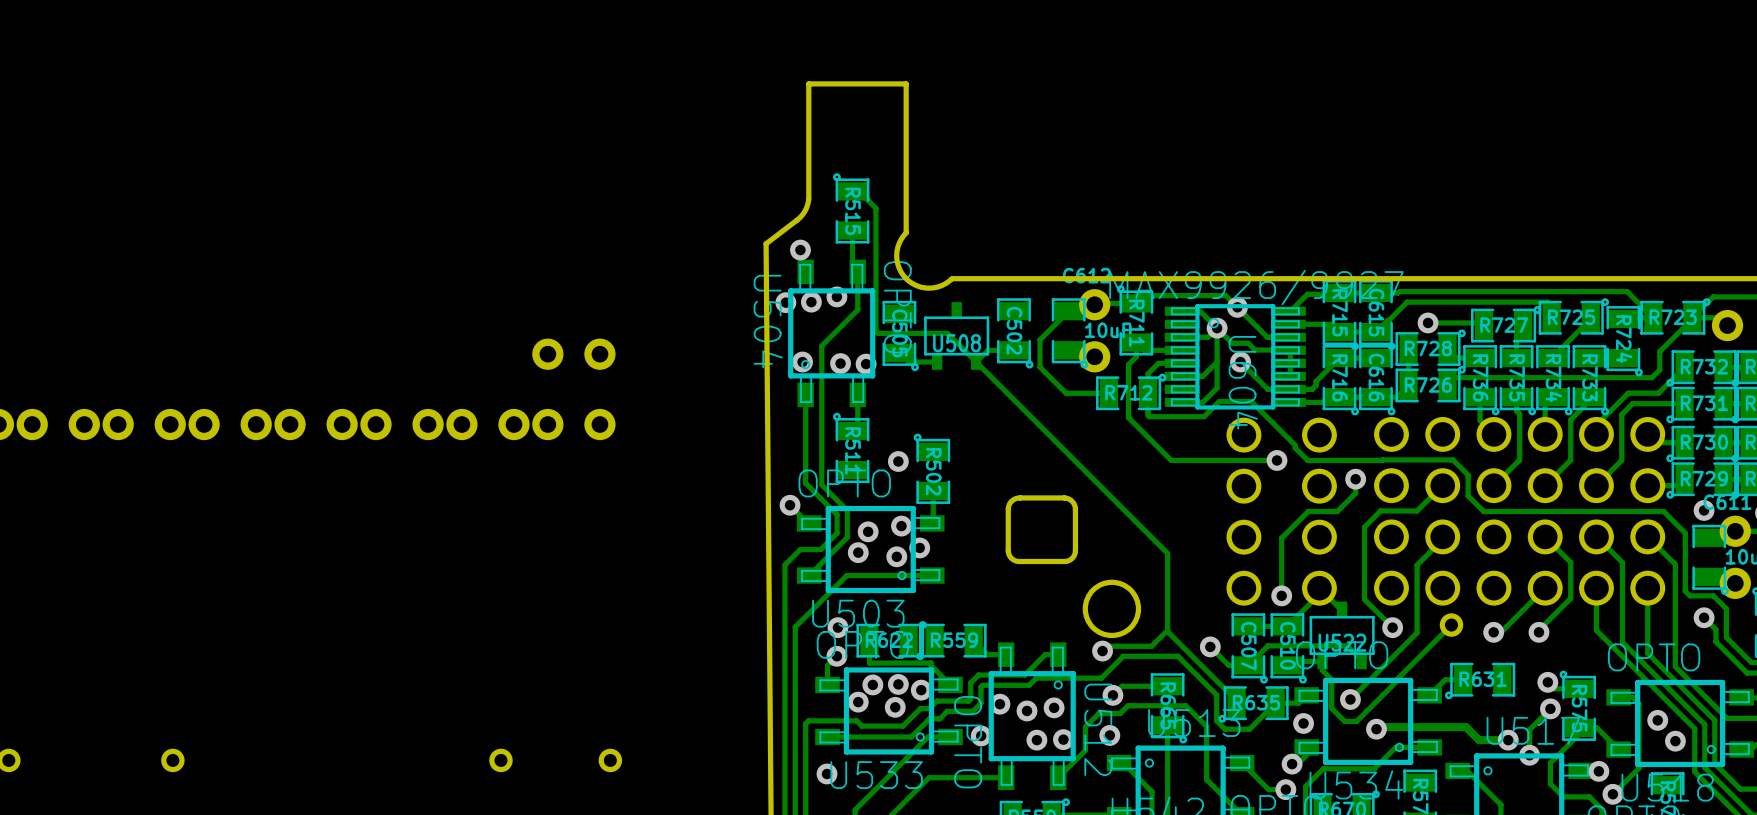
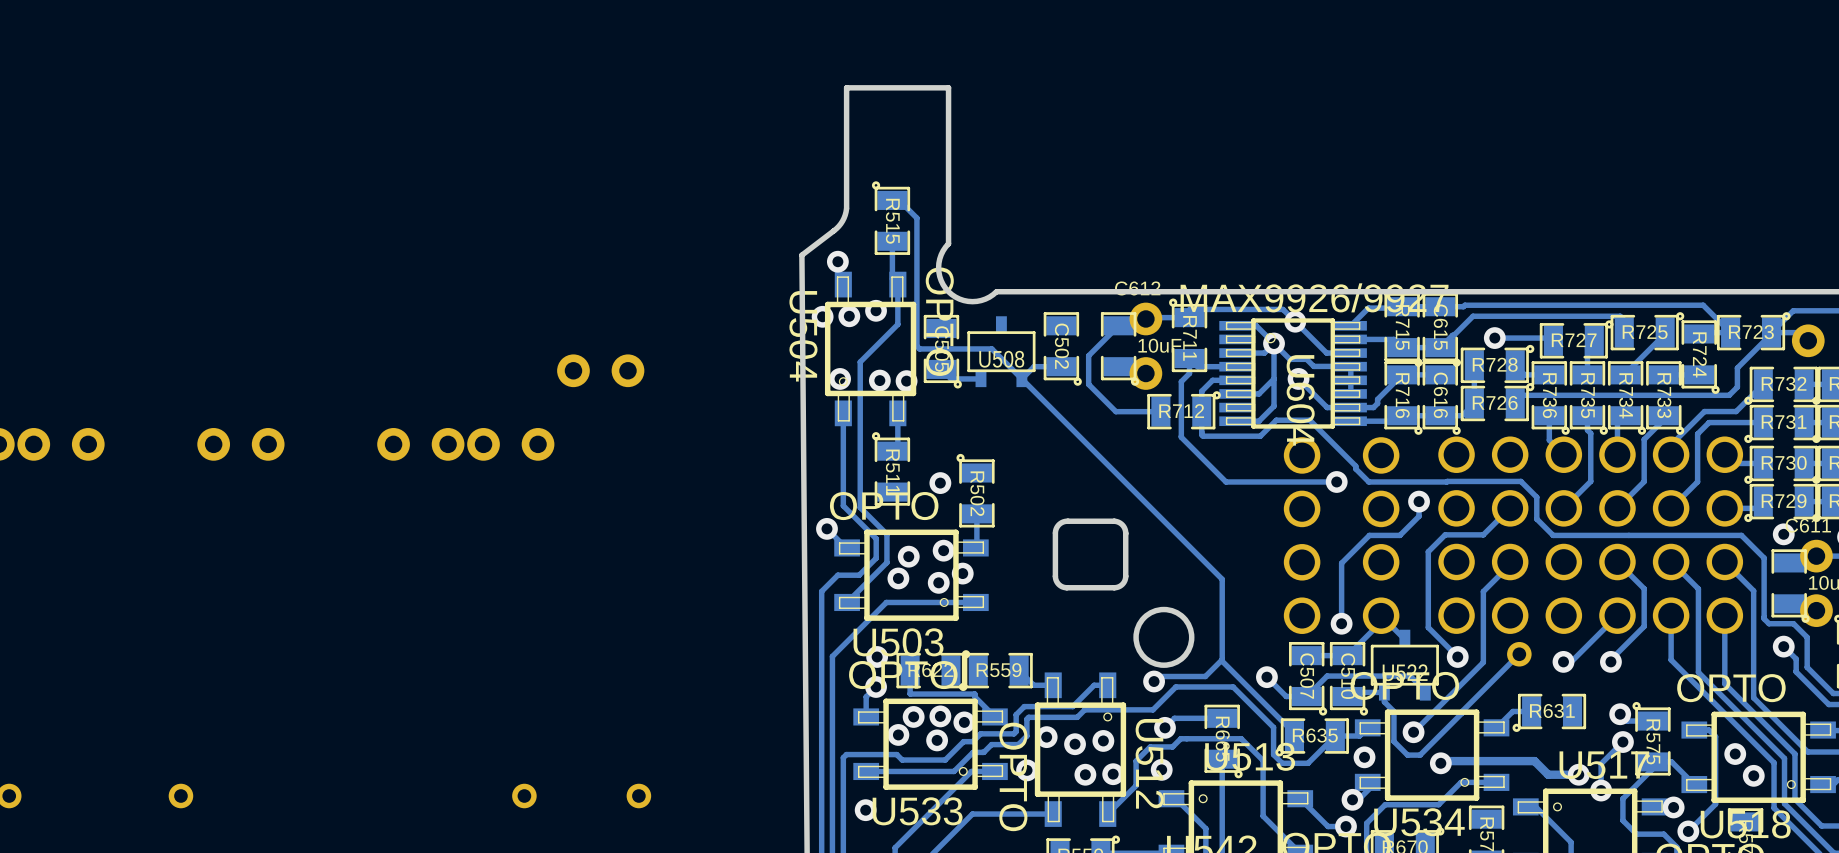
part: (144, 424) -> none
part: (316, 424) -> none
part: (573, 424) -> none

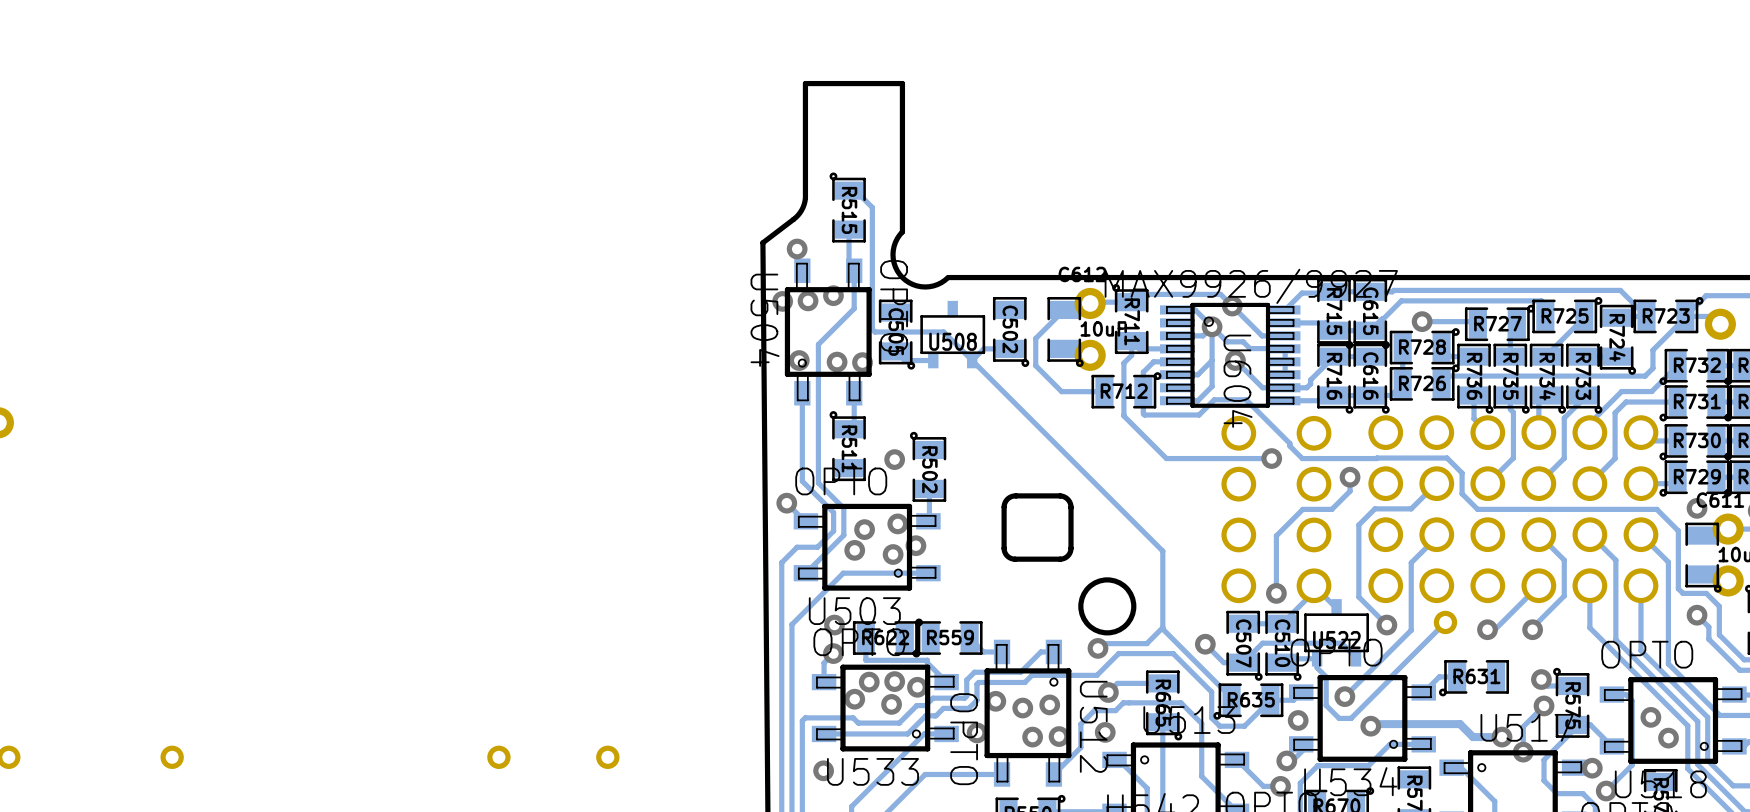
part: (600, 370) -> none
part: (61, 444) -> none
part: (240, 444) -> none
part: (420, 444) -> none
part: (510, 444) -> none

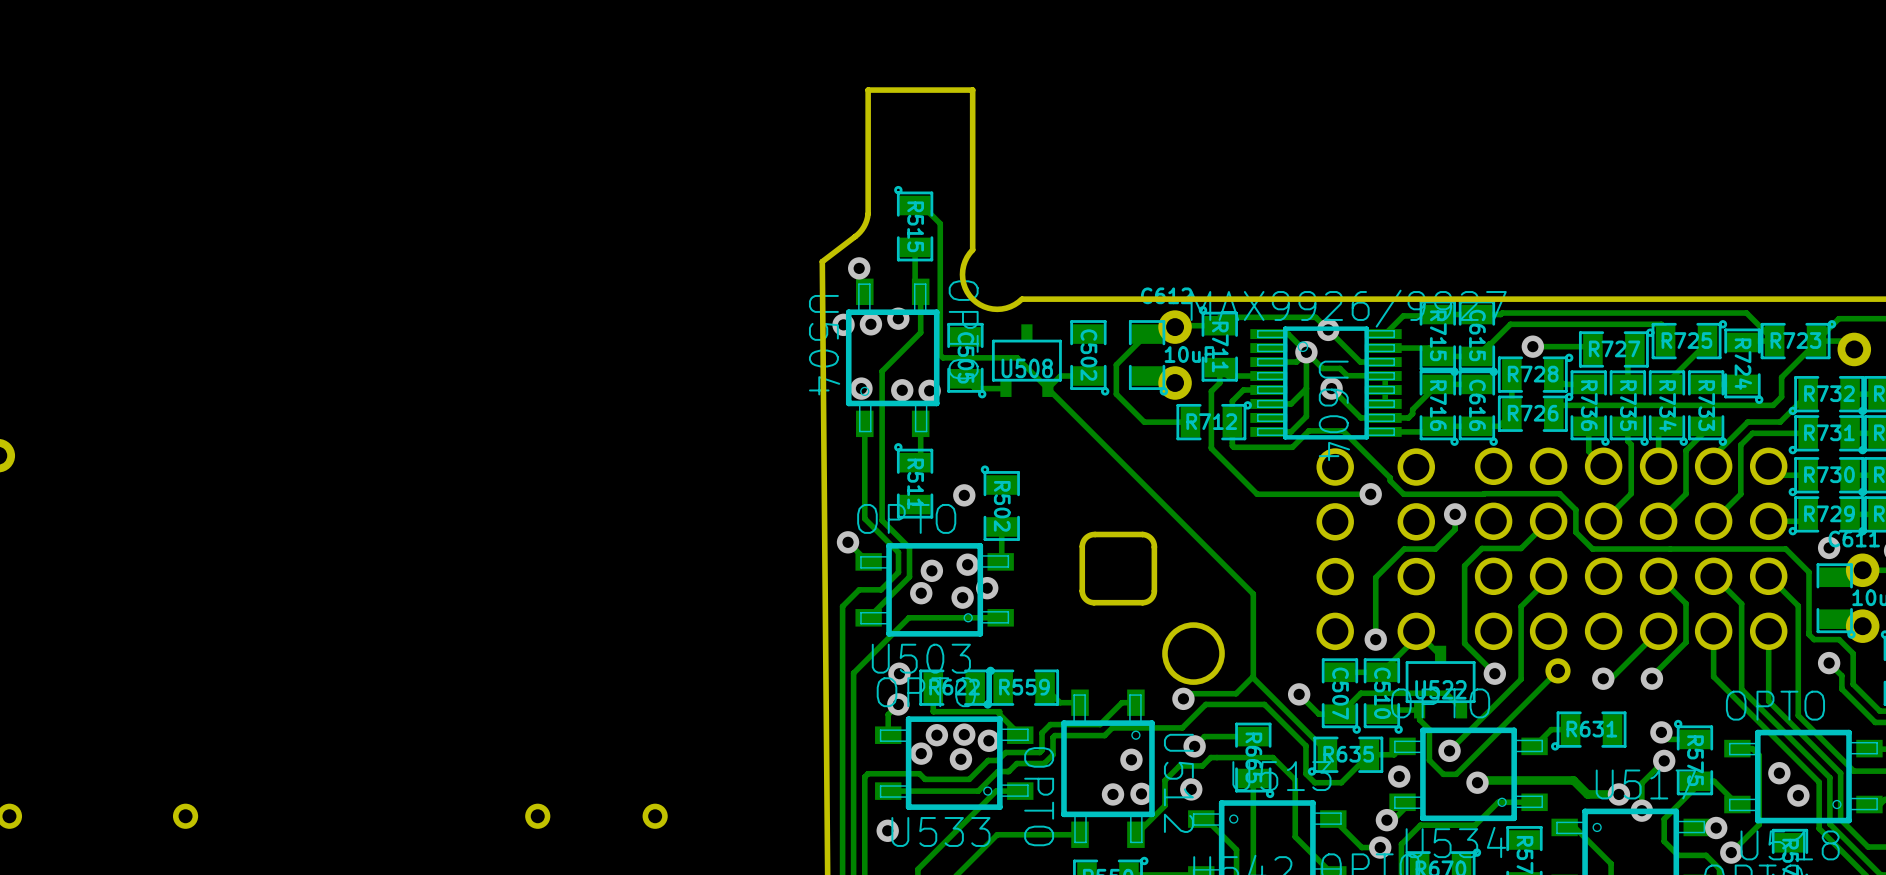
via: (995, 701) -> none
via: (1022, 708) -> none
via: (977, 732) -> none

